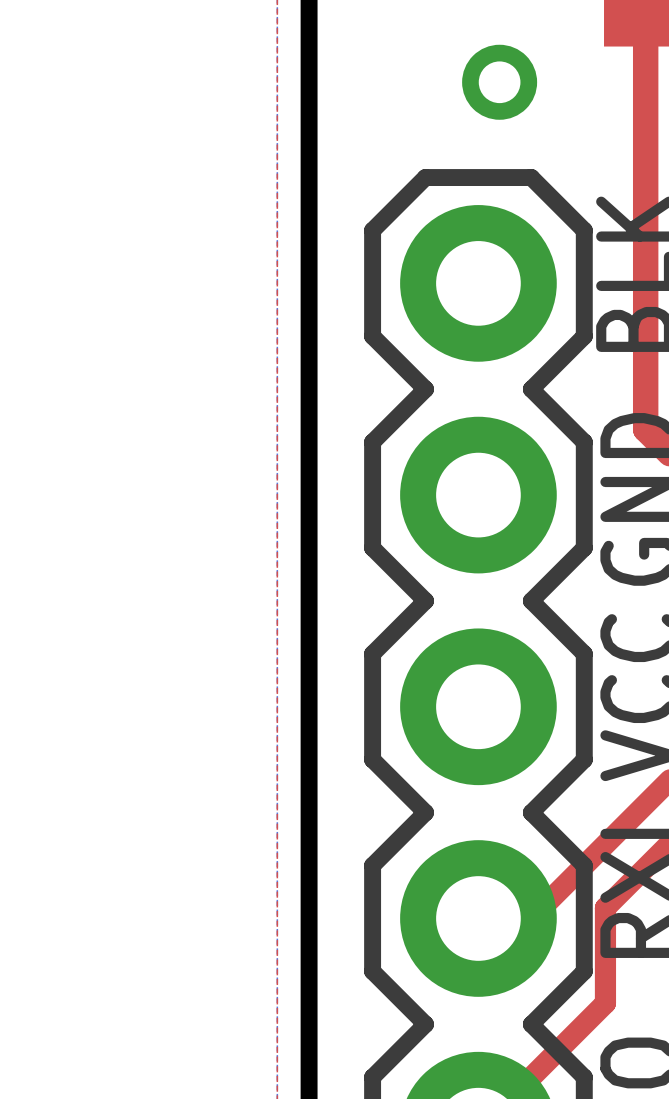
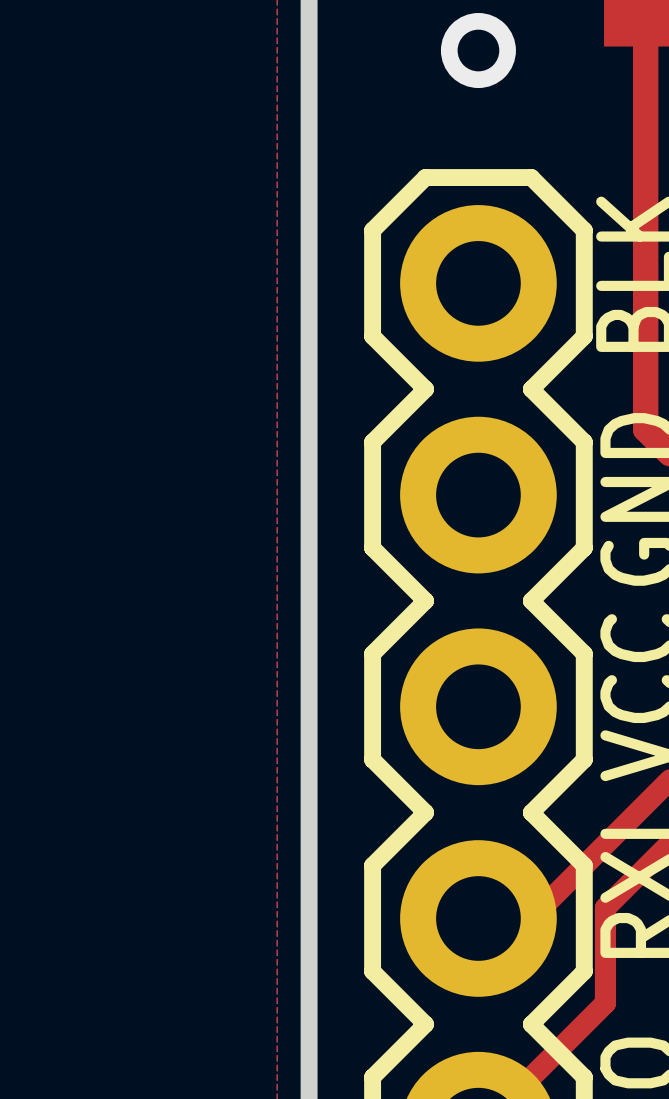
via position: (499, 82) -> (478, 50)

